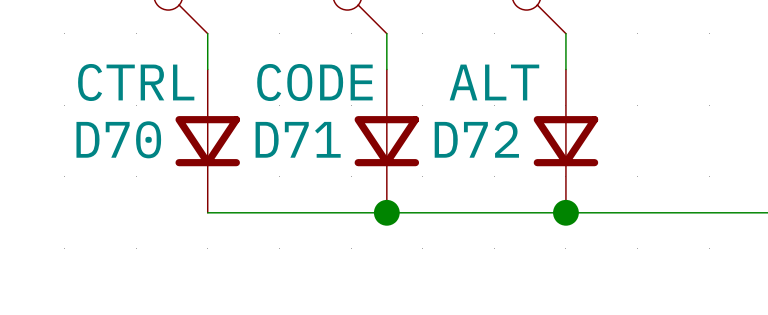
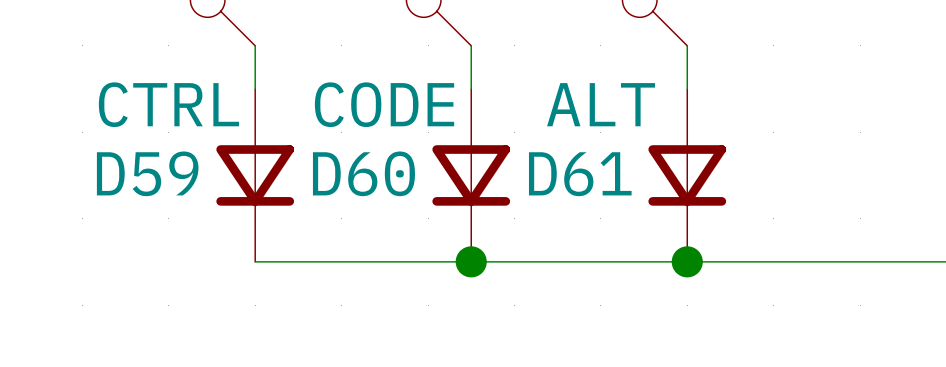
D70 name: D70 (118, 139) -> D59 (147, 173)
D71 name: D71 (298, 139) -> D60 (363, 173)
D72 name: D72 (476, 139) -> D61 (580, 174)

